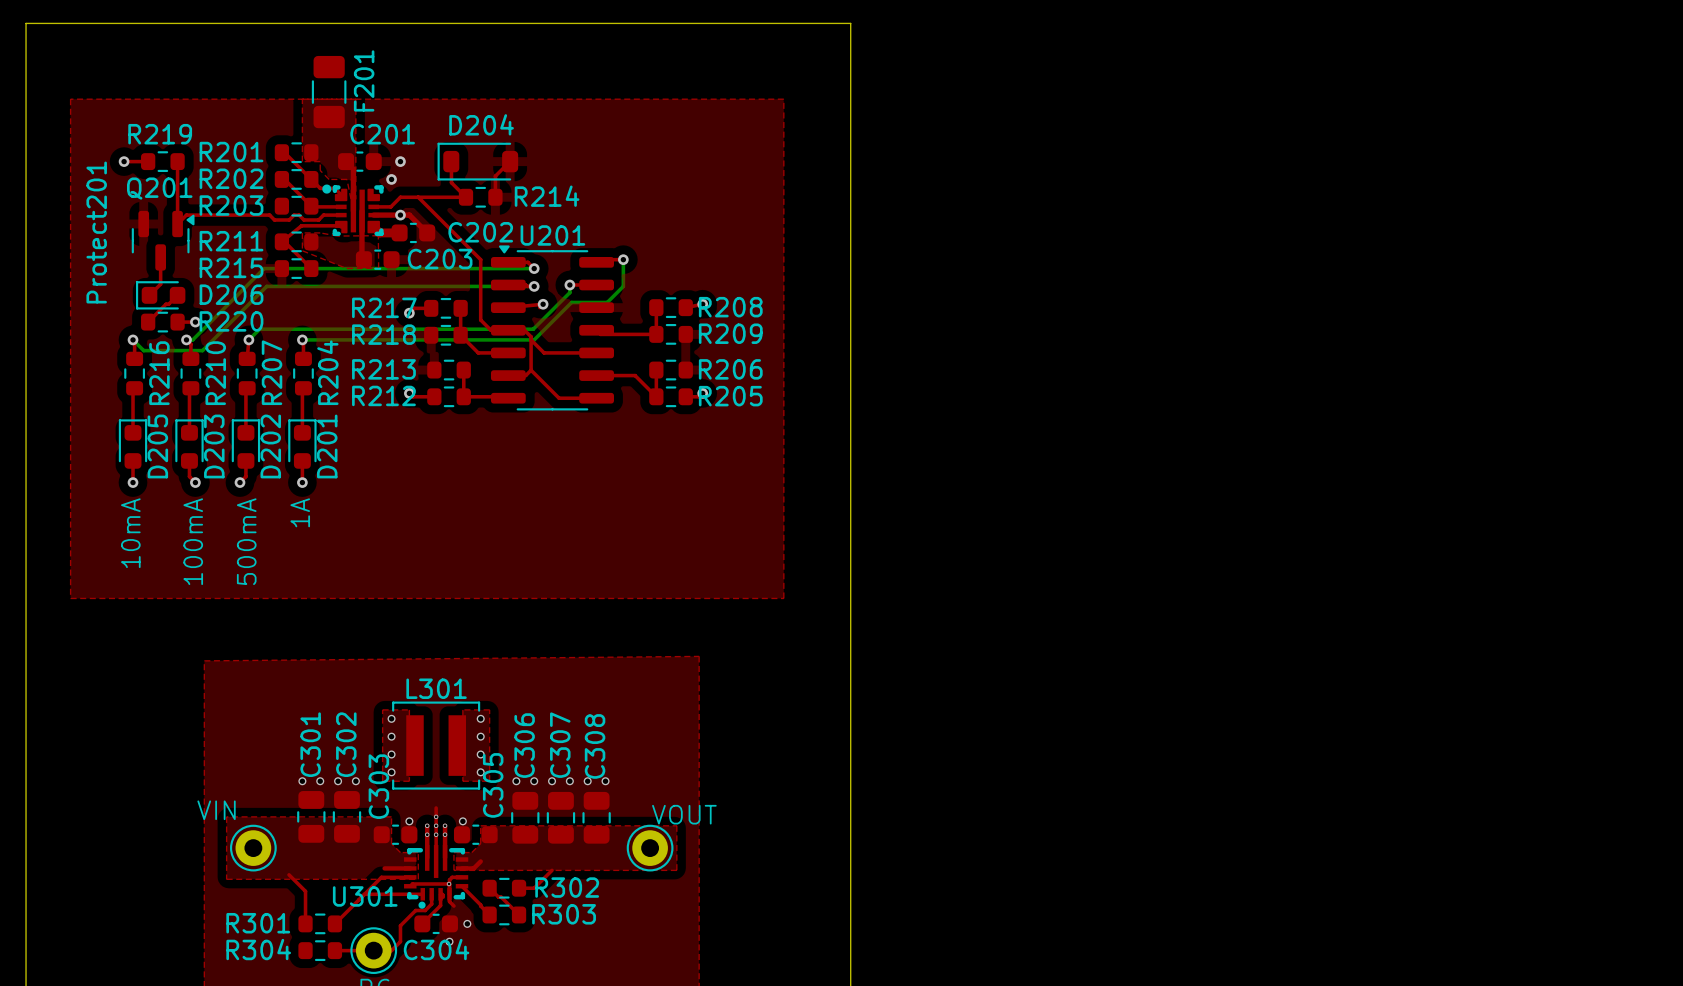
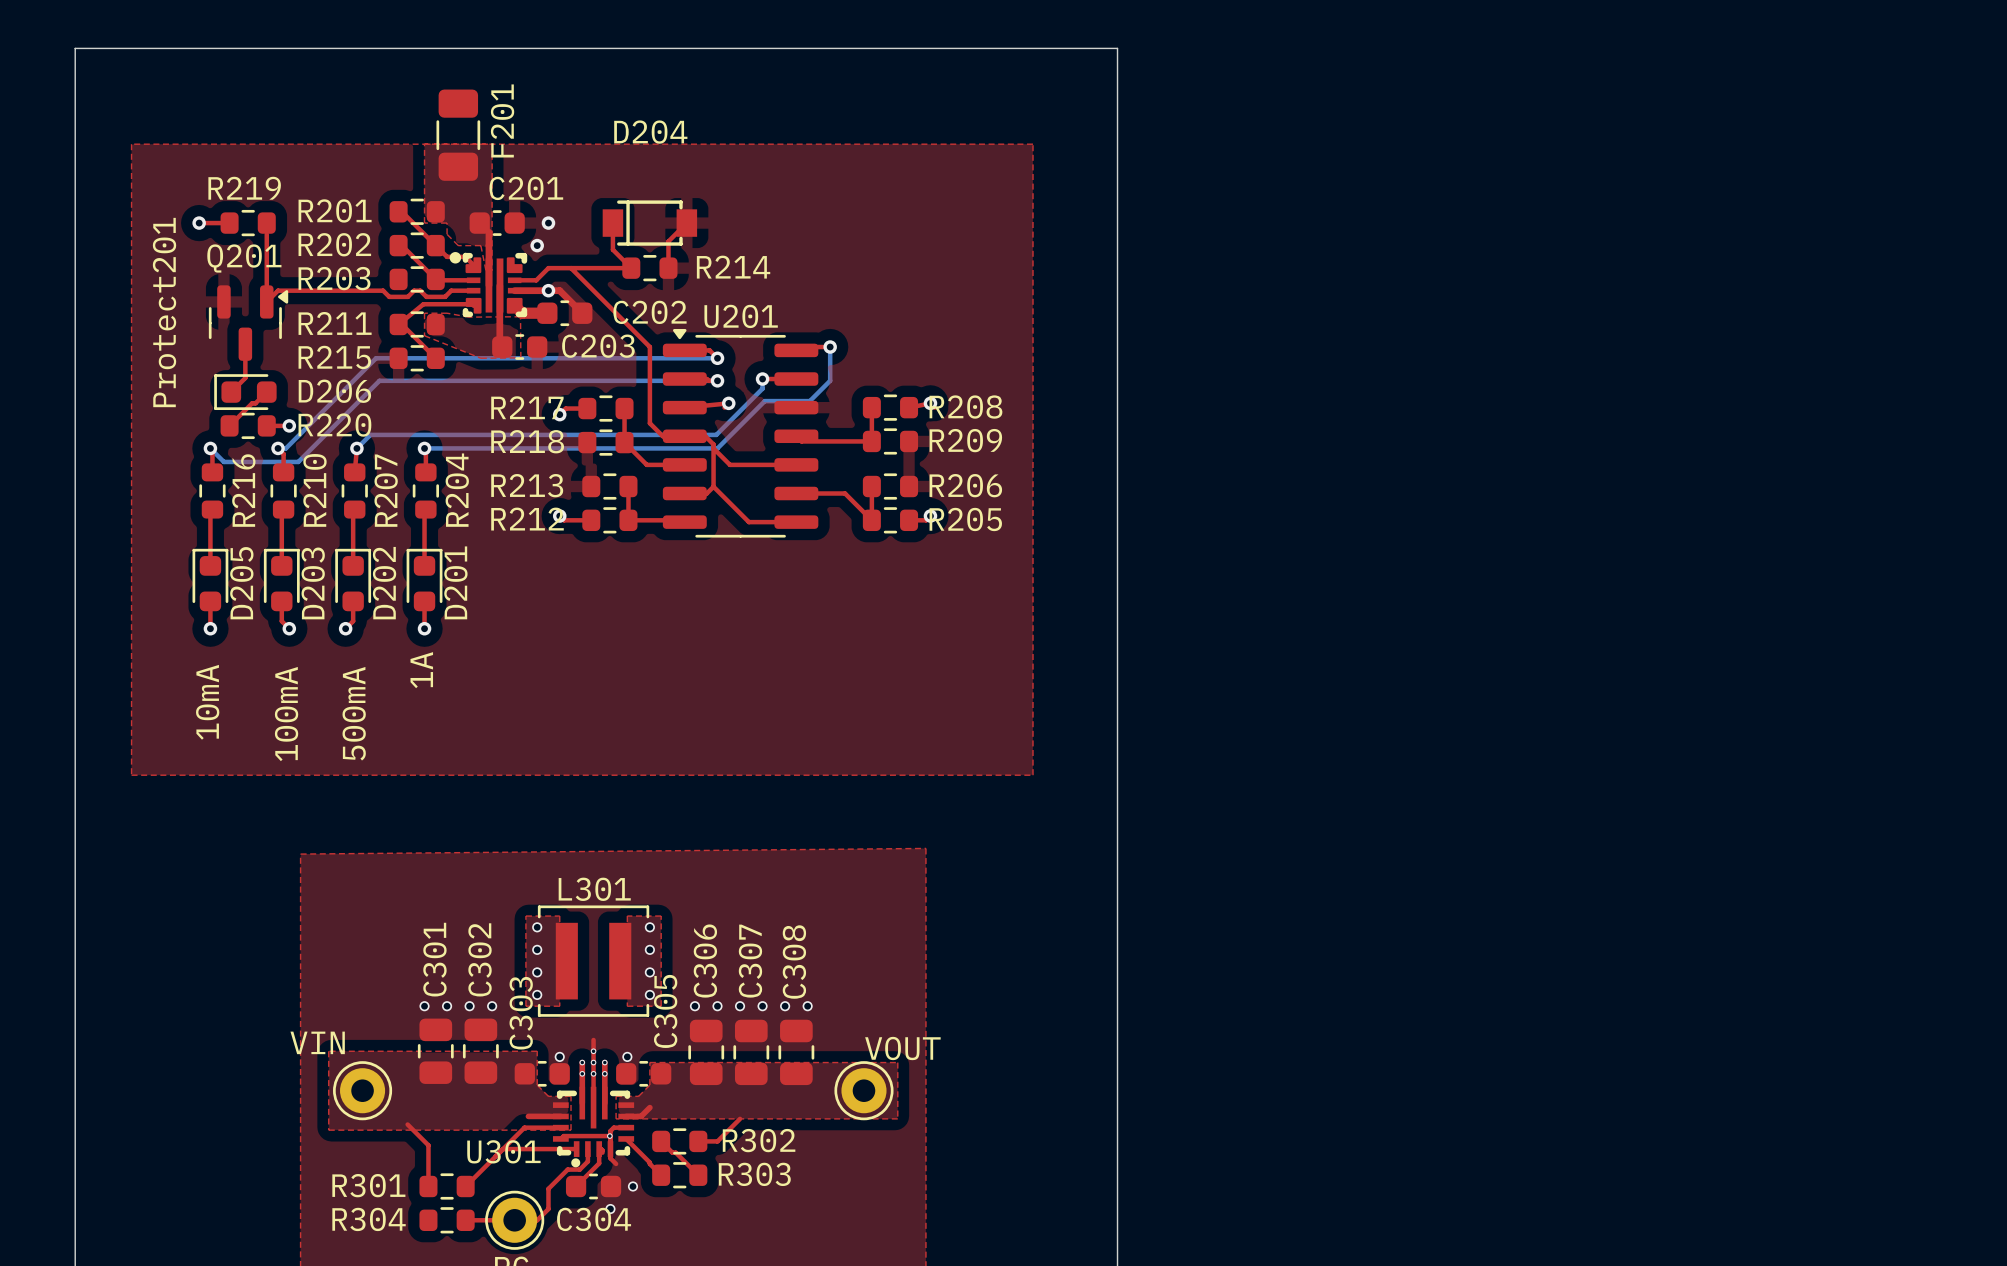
D204 name position: D204 (481, 124) -> D204 (650, 132)
D204 footprint: [437, 142, 519, 181] -> [602, 200, 698, 246]

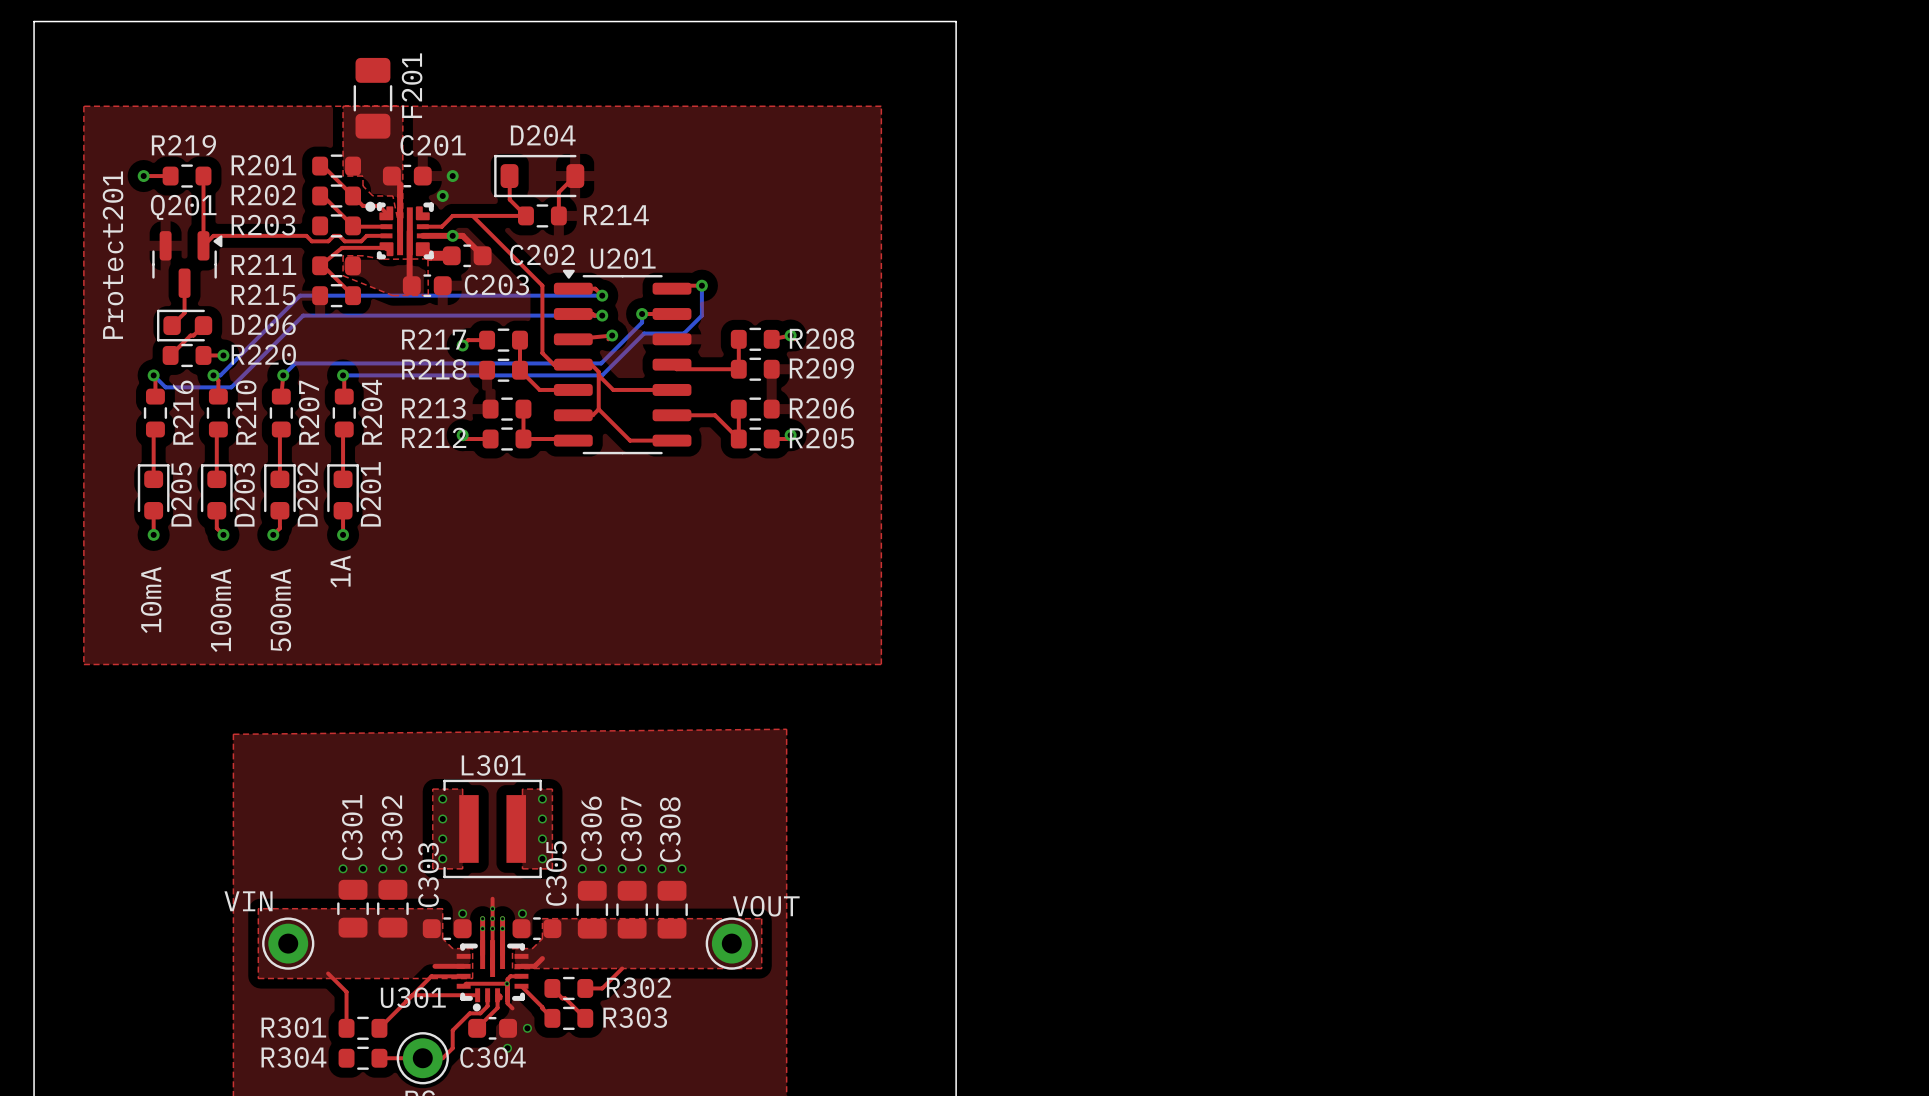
D204 name position: D204 (650, 132) -> D204 (543, 135)
D204 footprint: [602, 200, 698, 246] -> [494, 154, 585, 198]

